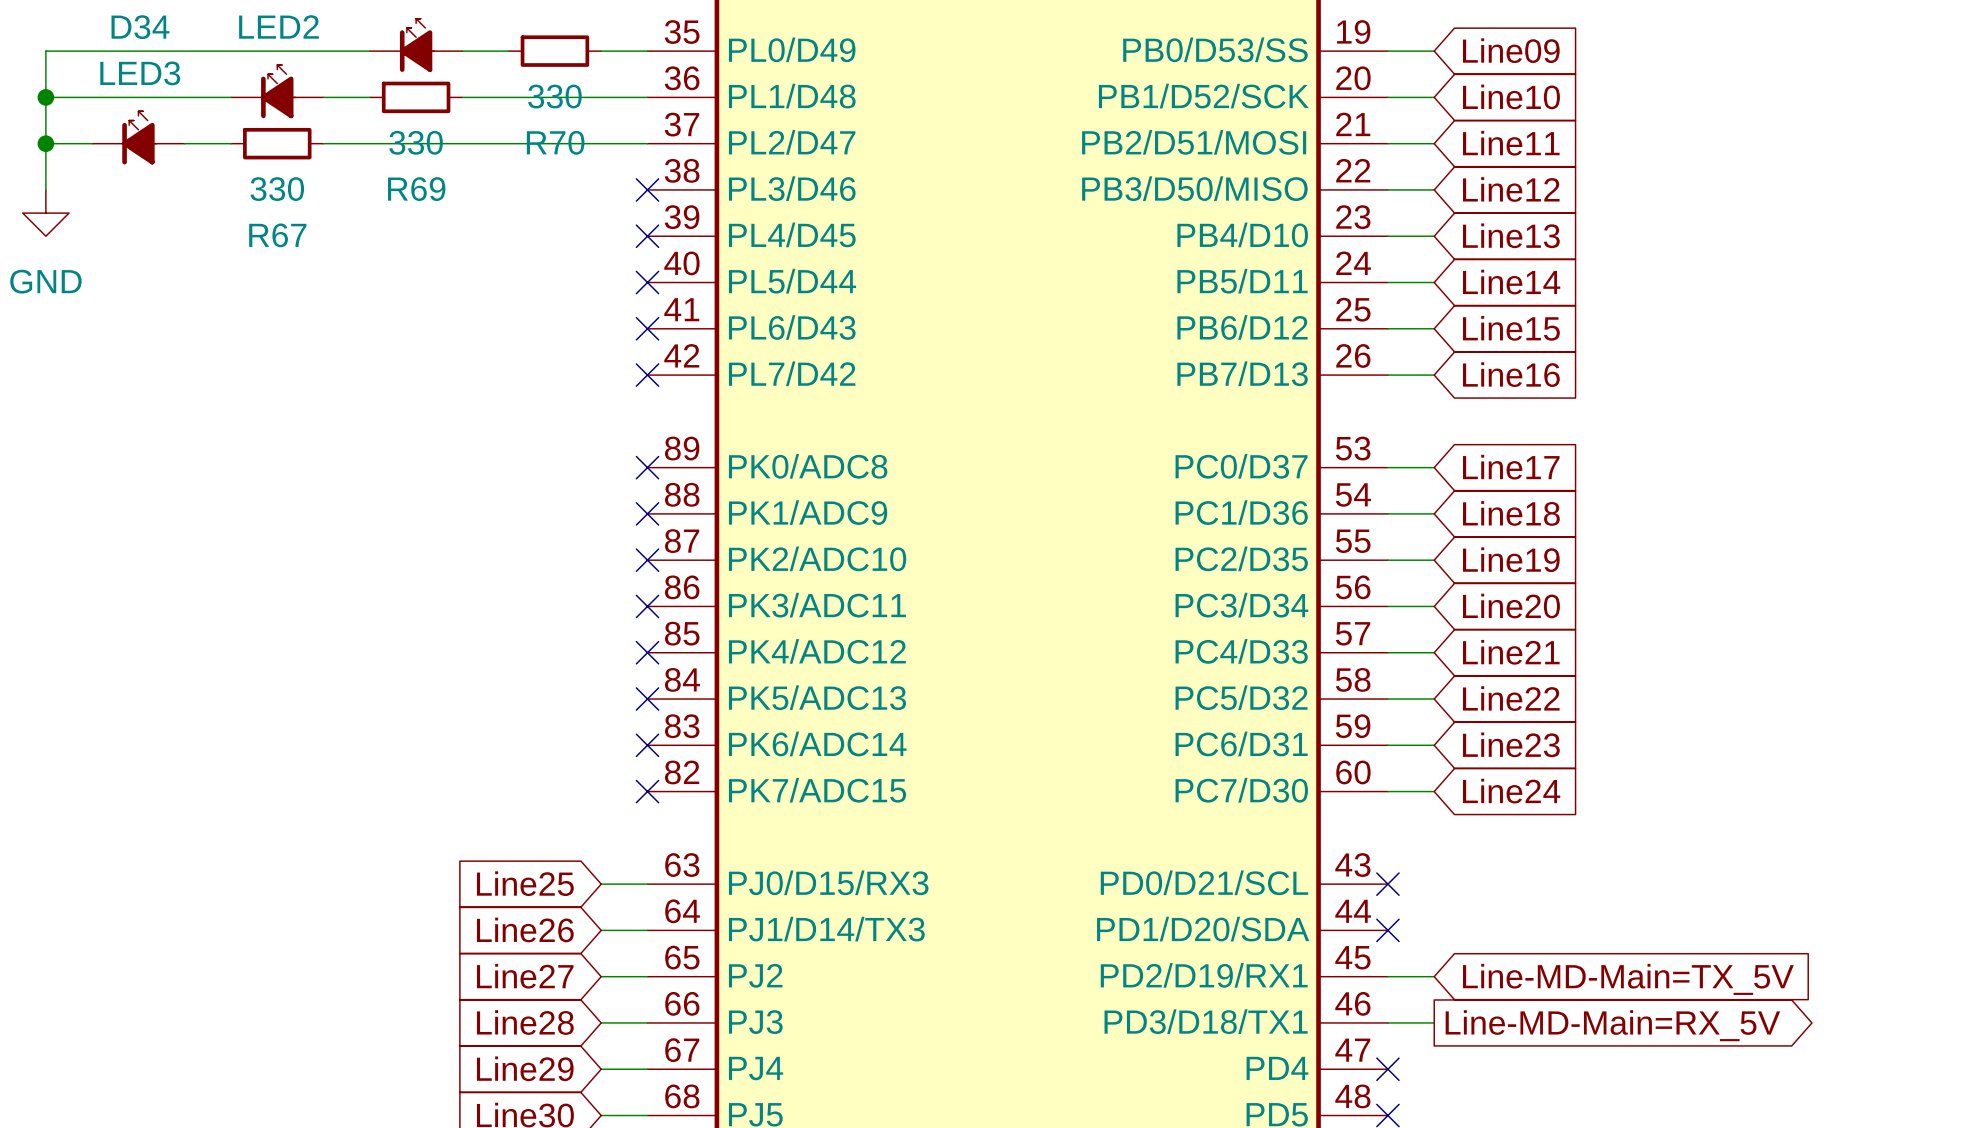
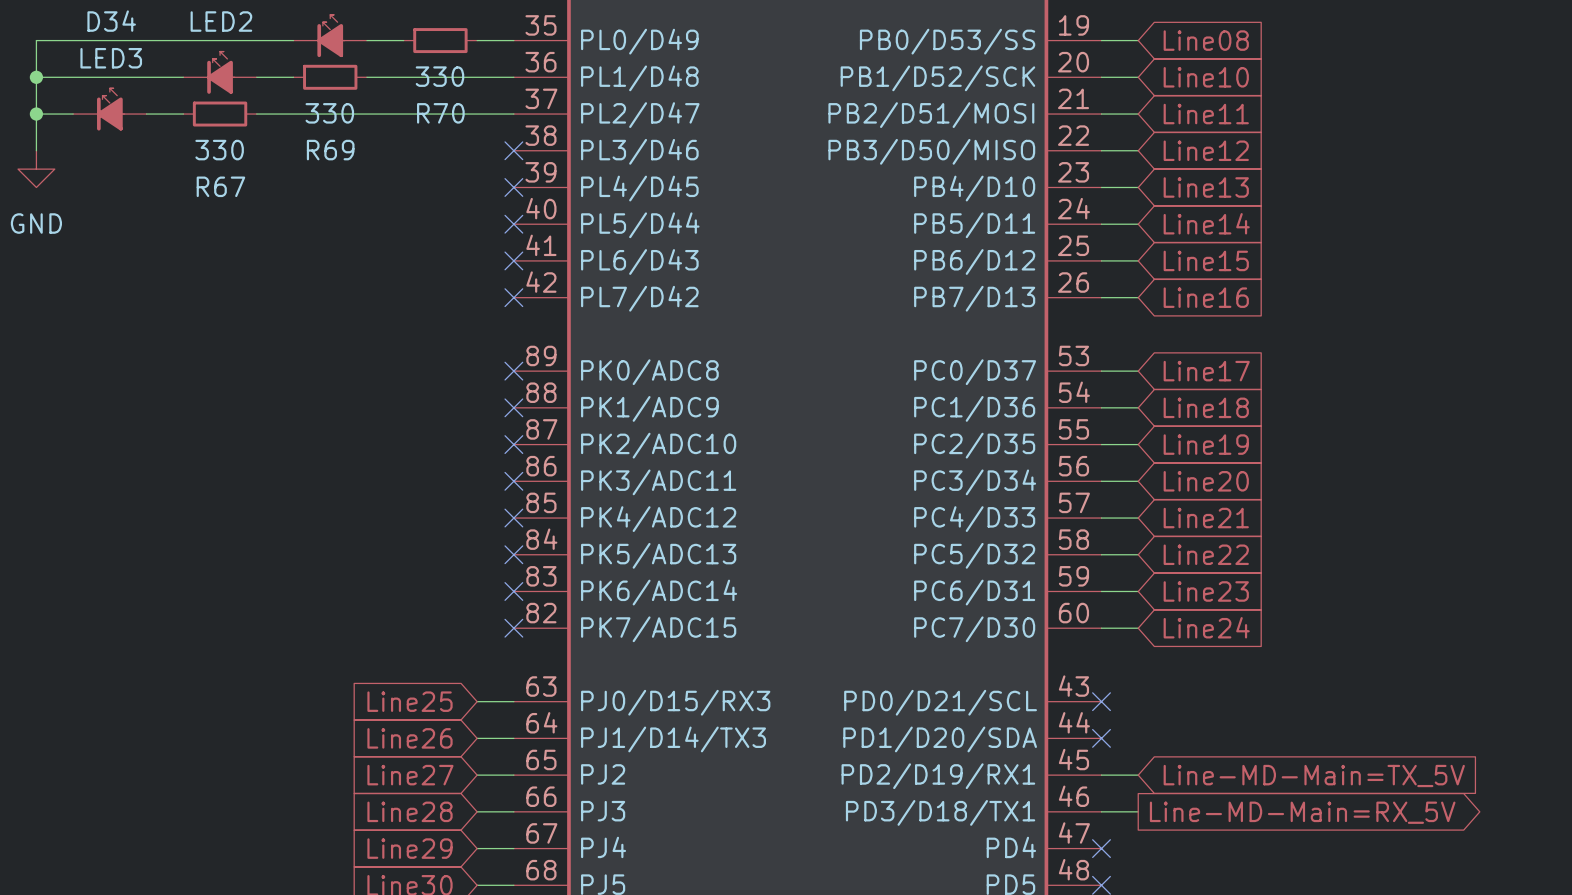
global label: Line09 (1511, 50) -> Line08 (1206, 40)

